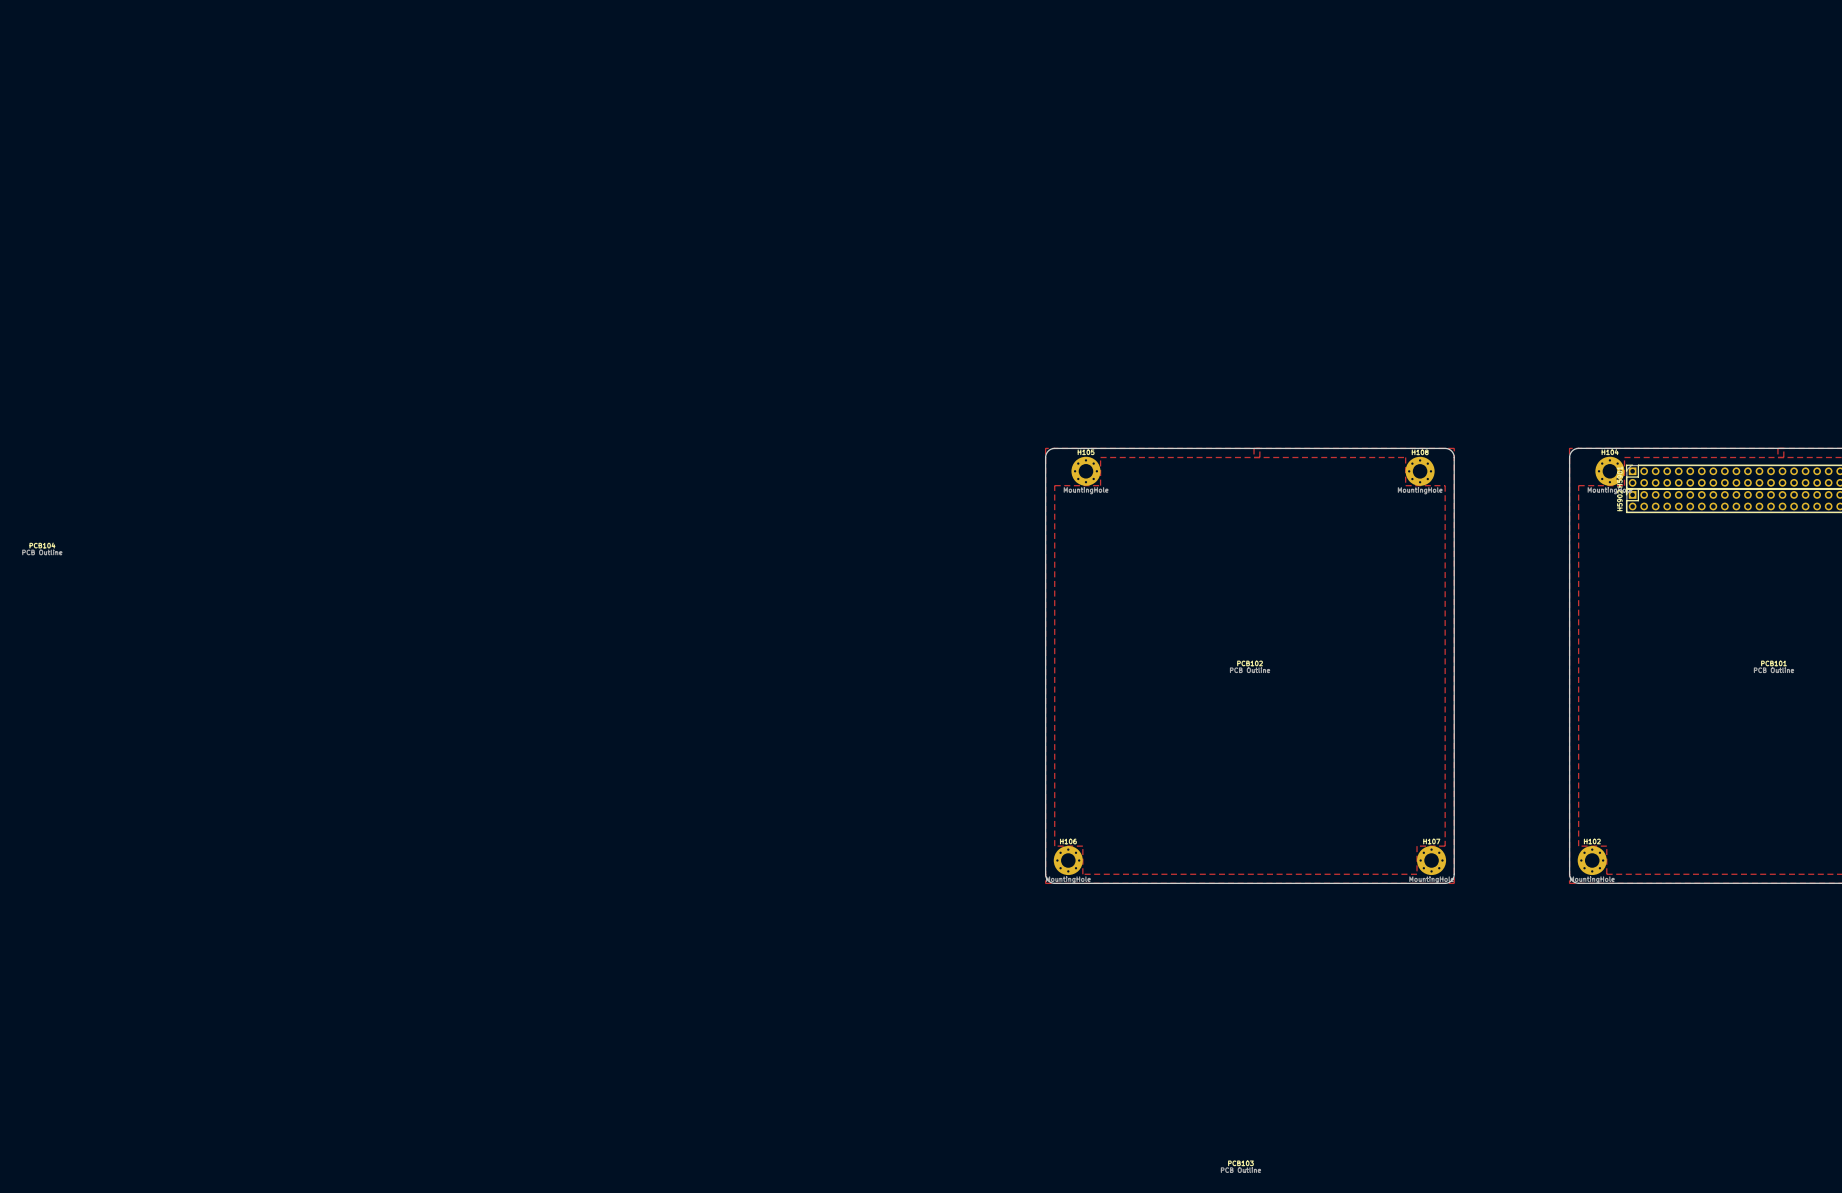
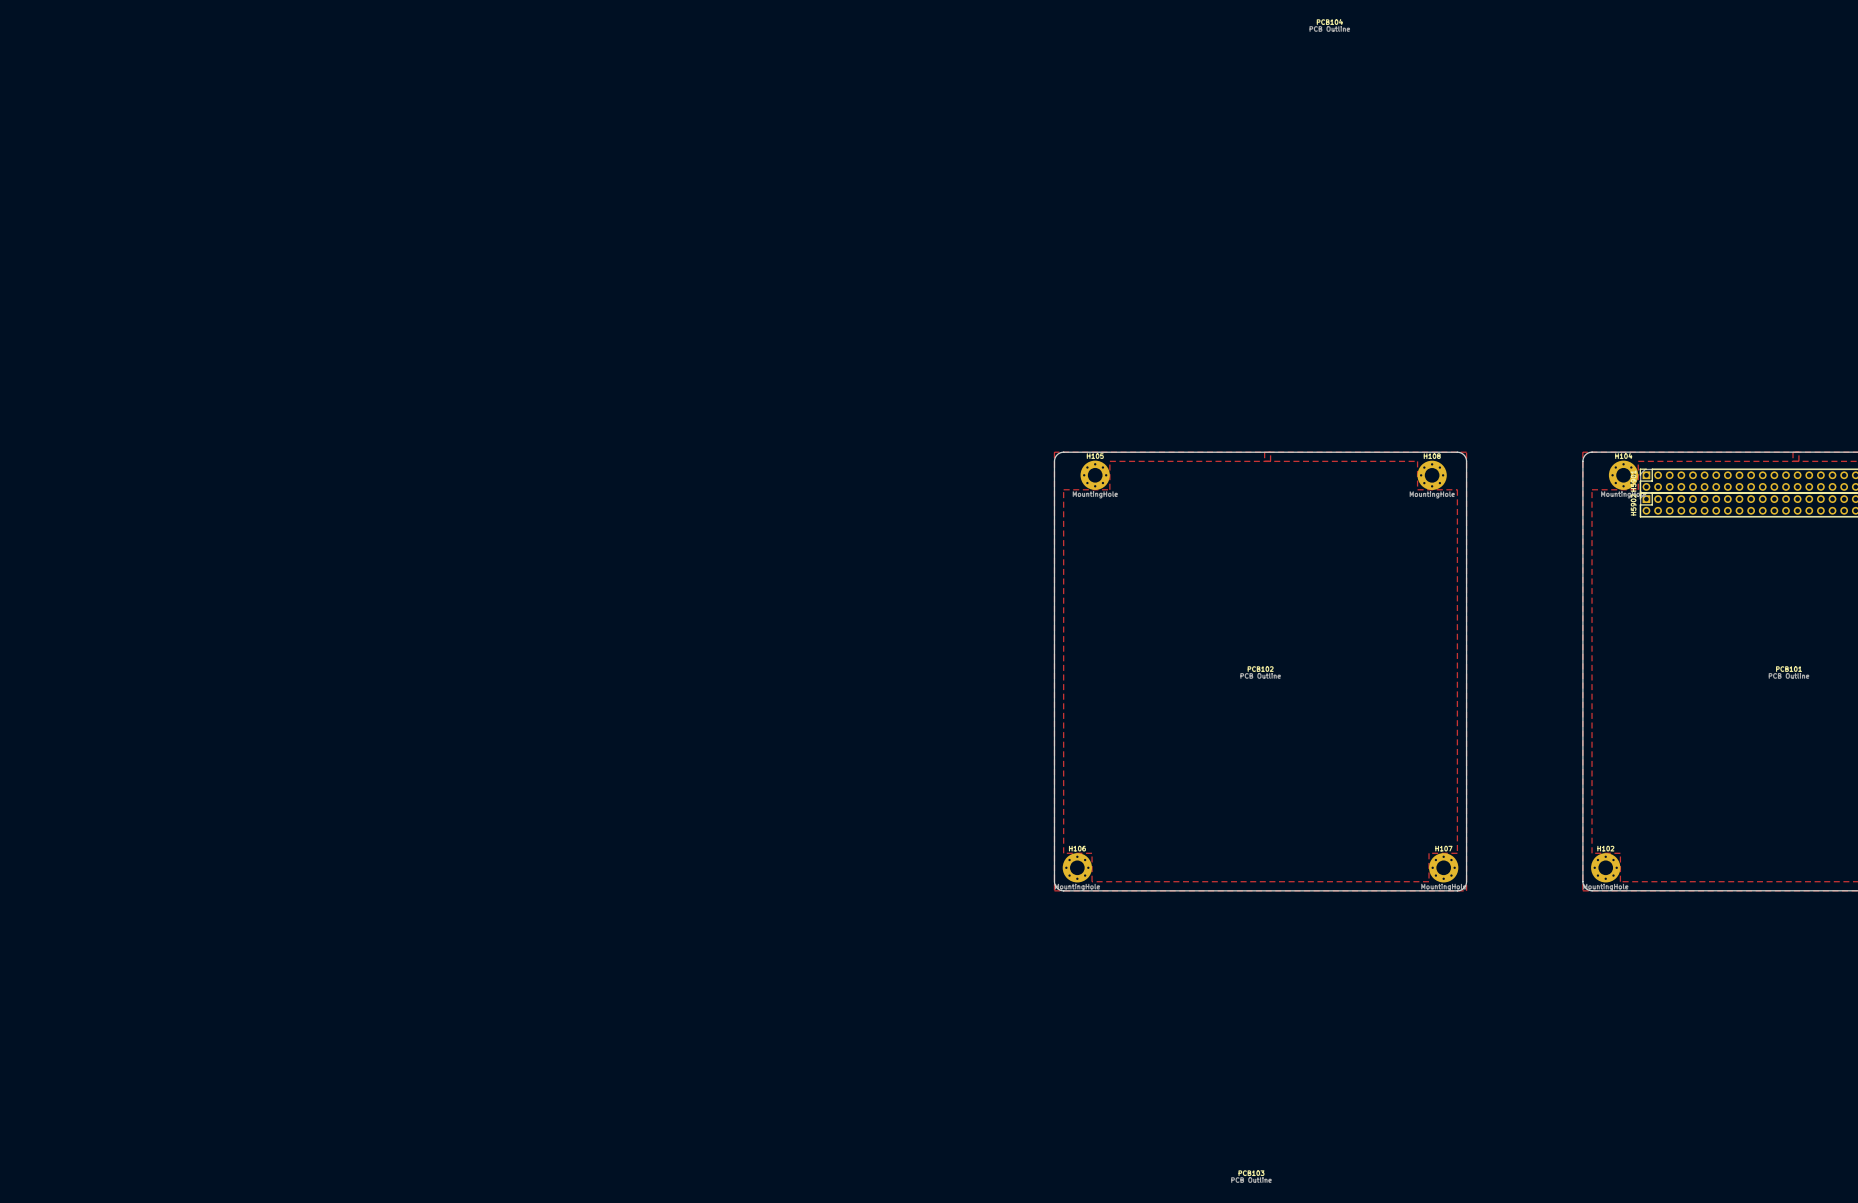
part position: (42, 548) -> (1329, 25)

